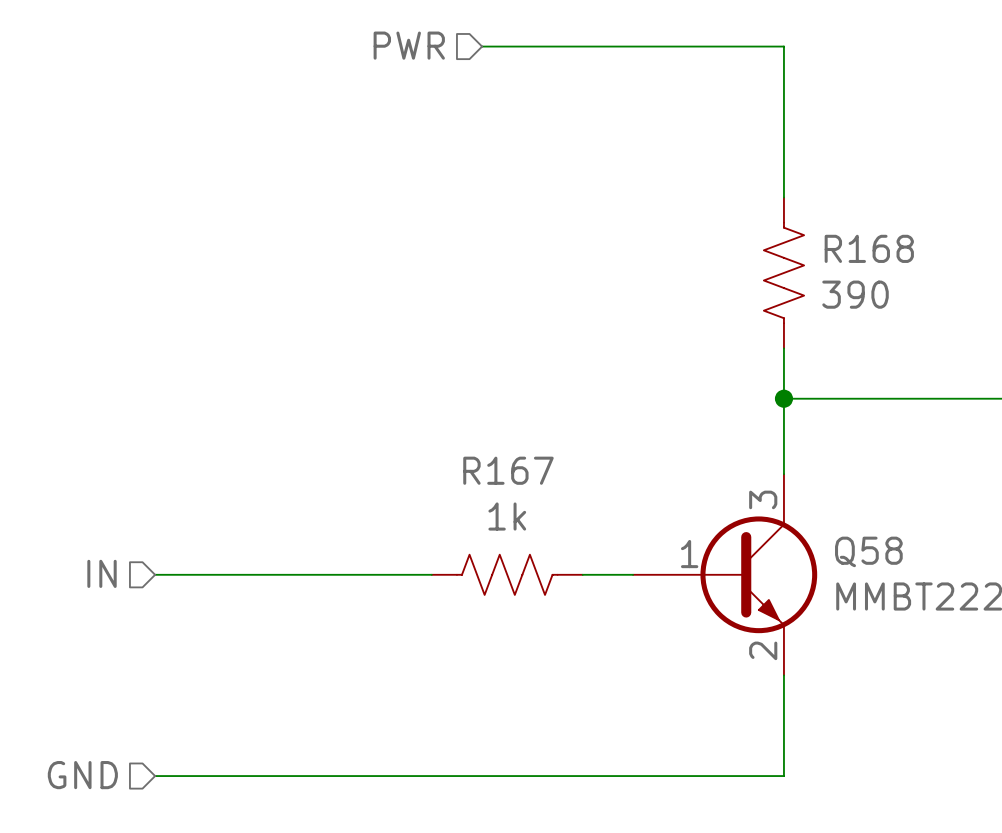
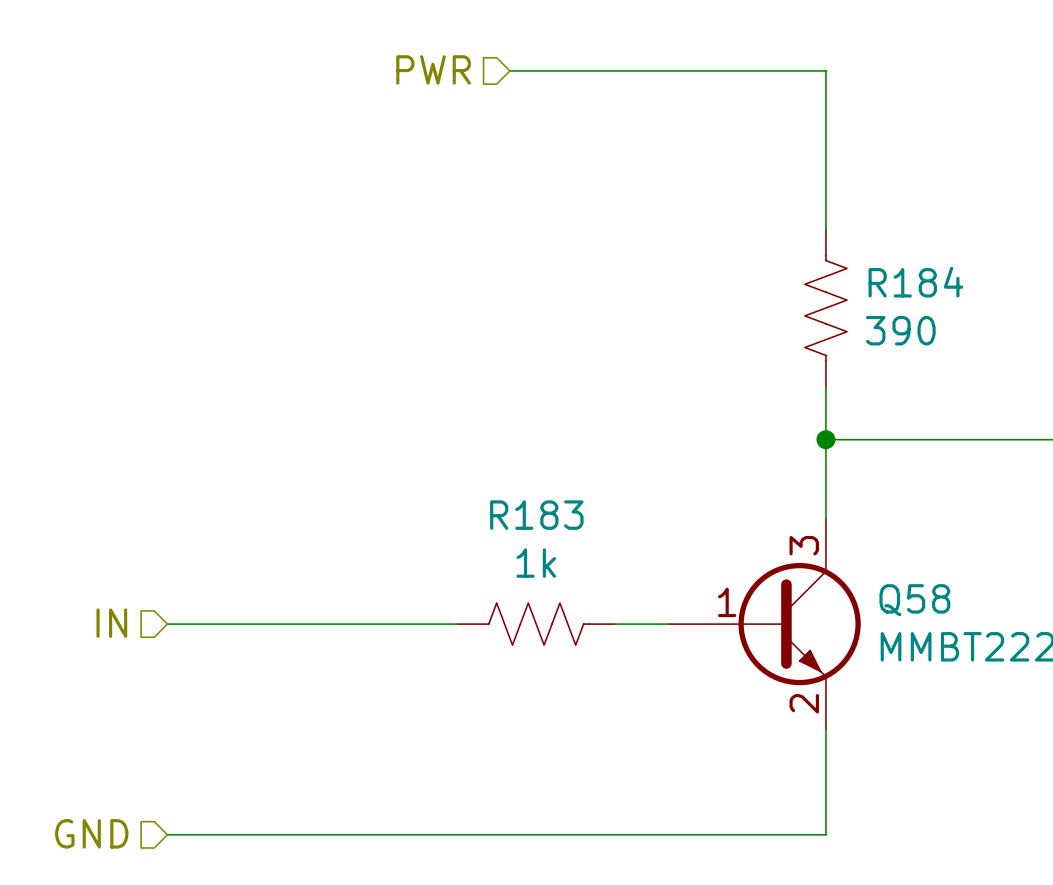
R168 name: R168 (869, 248) -> R184 (915, 282)
R167 name: R167 (508, 470) -> R183 (536, 515)

